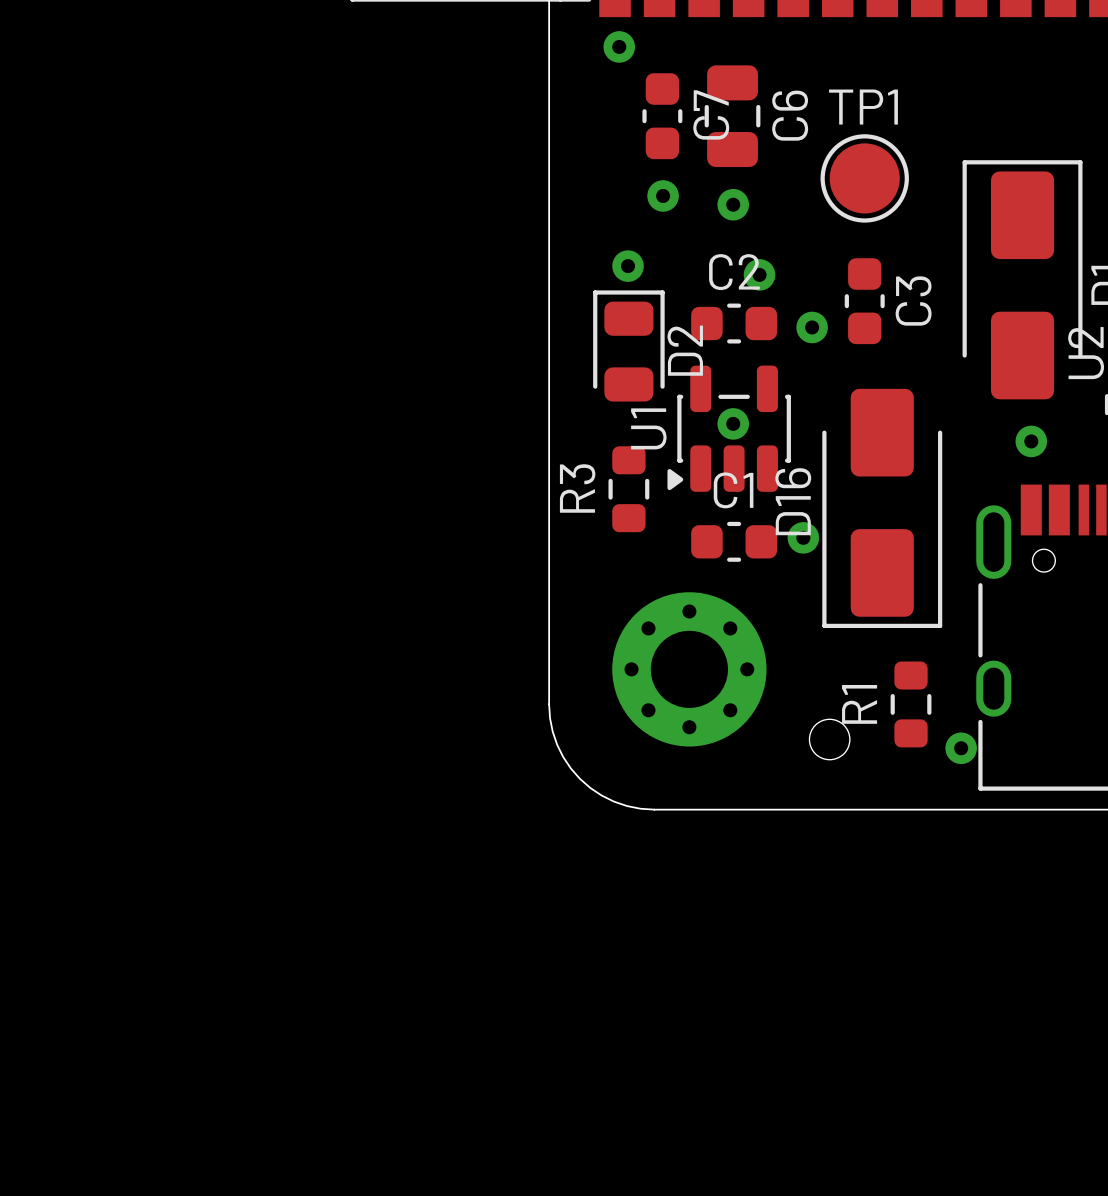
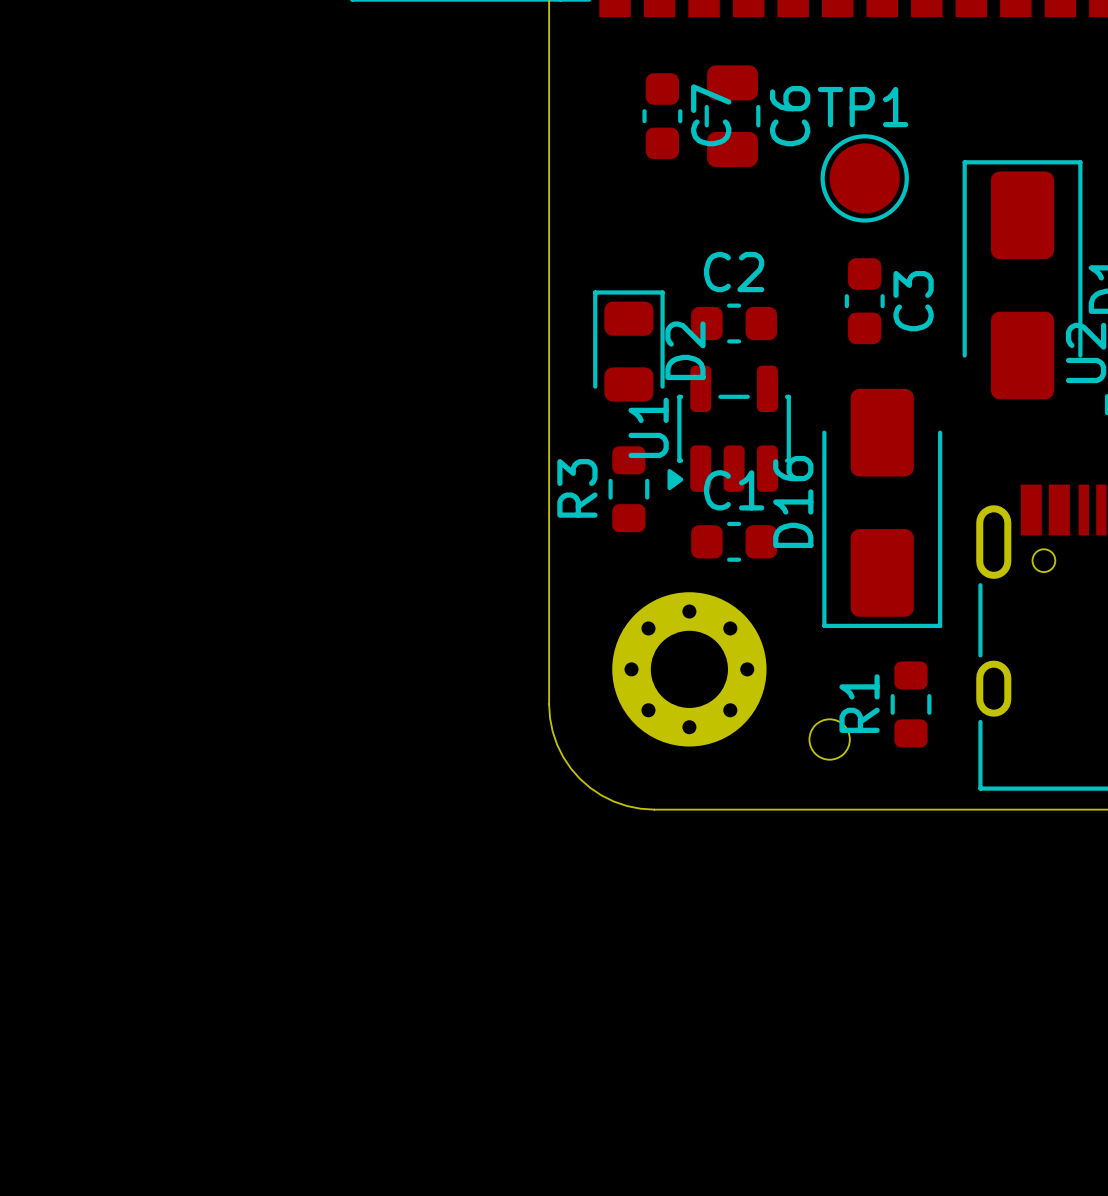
via: (619, 46) -> none
via: (663, 195) -> none
via: (733, 204) -> none
via: (628, 266) -> none
via: (759, 274) -> none
via: (812, 327) -> none
via: (733, 423) -> none
via: (1031, 441) -> none
via: (803, 537) -> none
via: (961, 748) -> none

